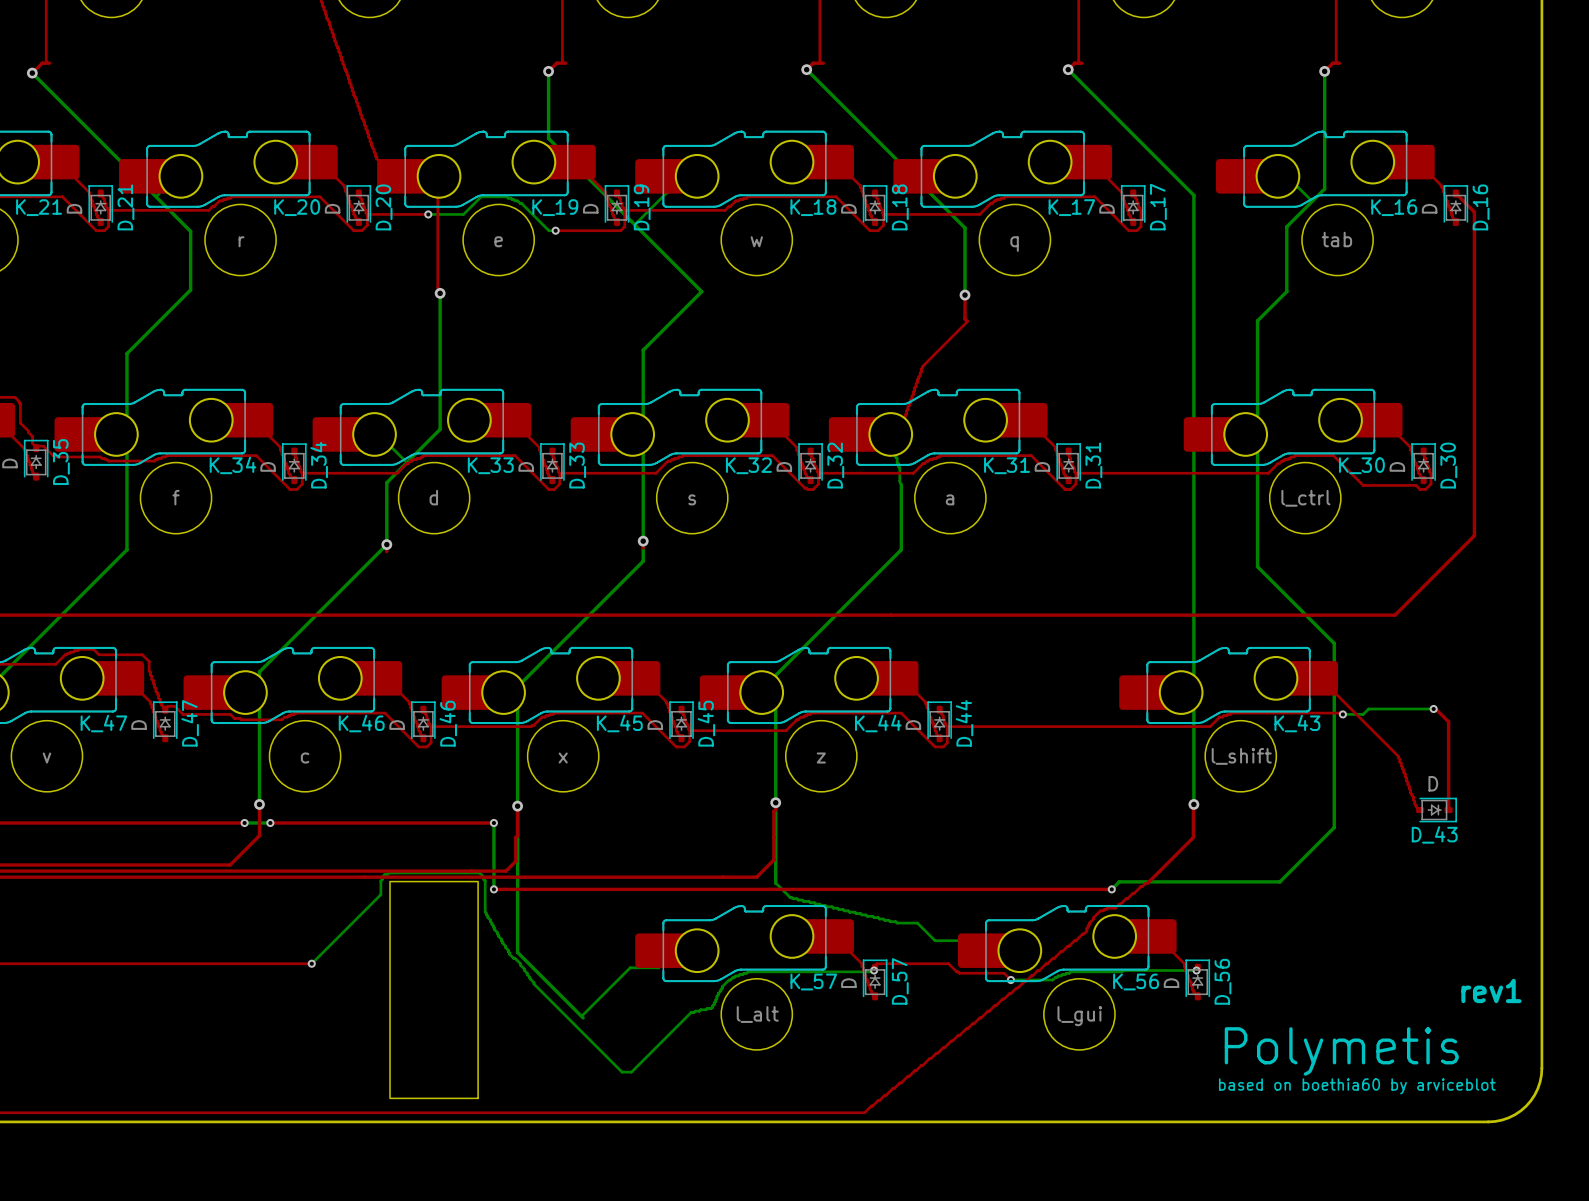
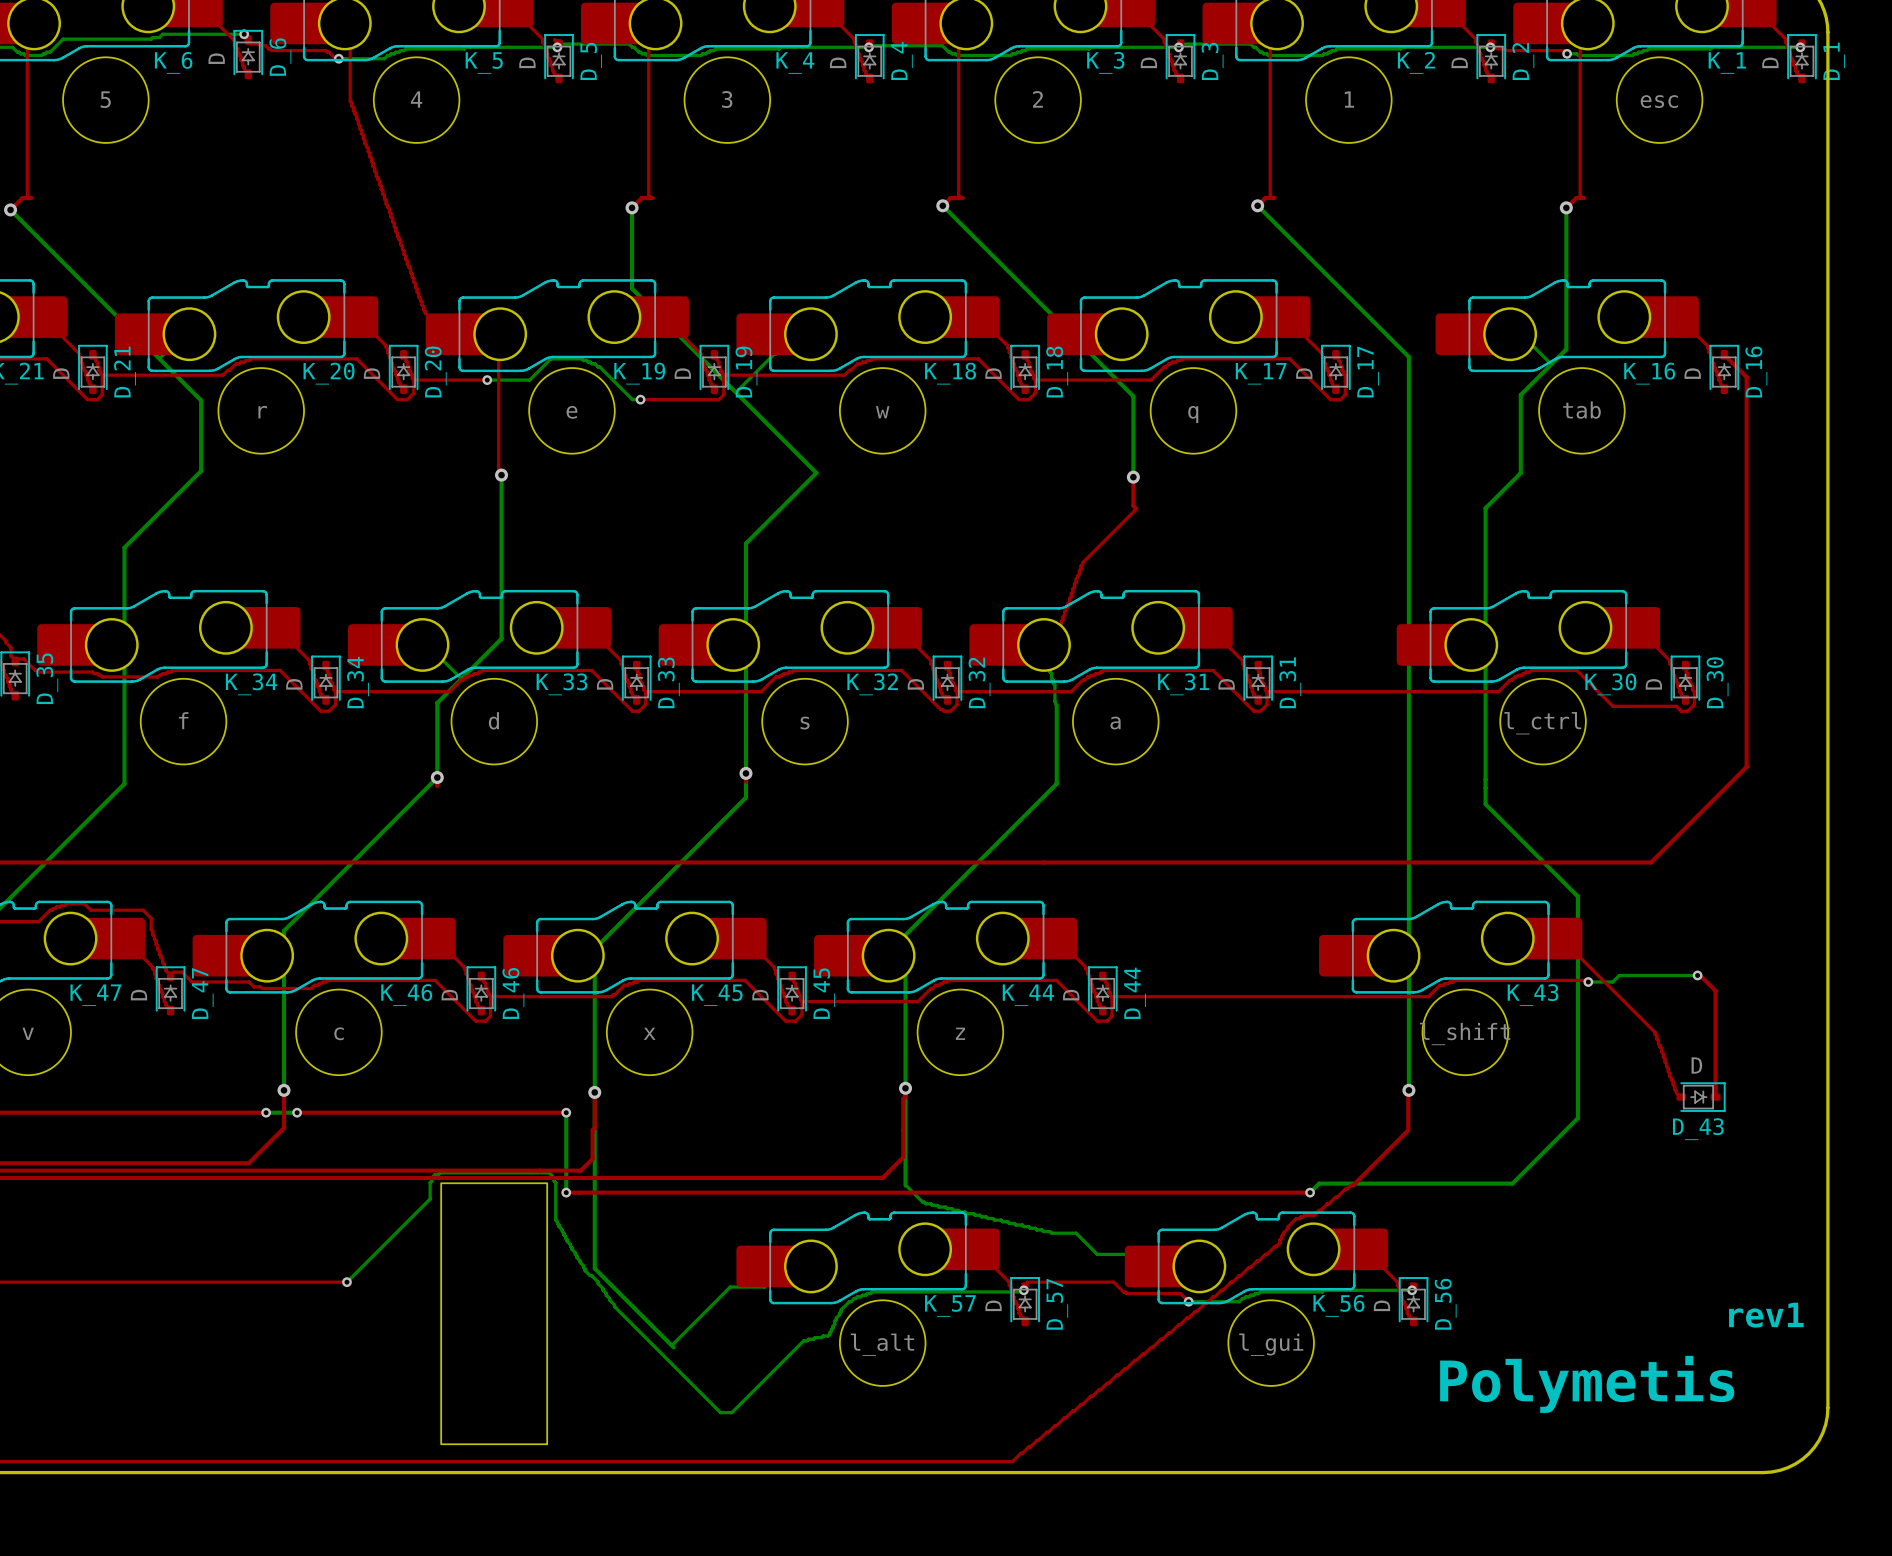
text: based on boethia60 by arviceblot (1357, 1086) -> none

